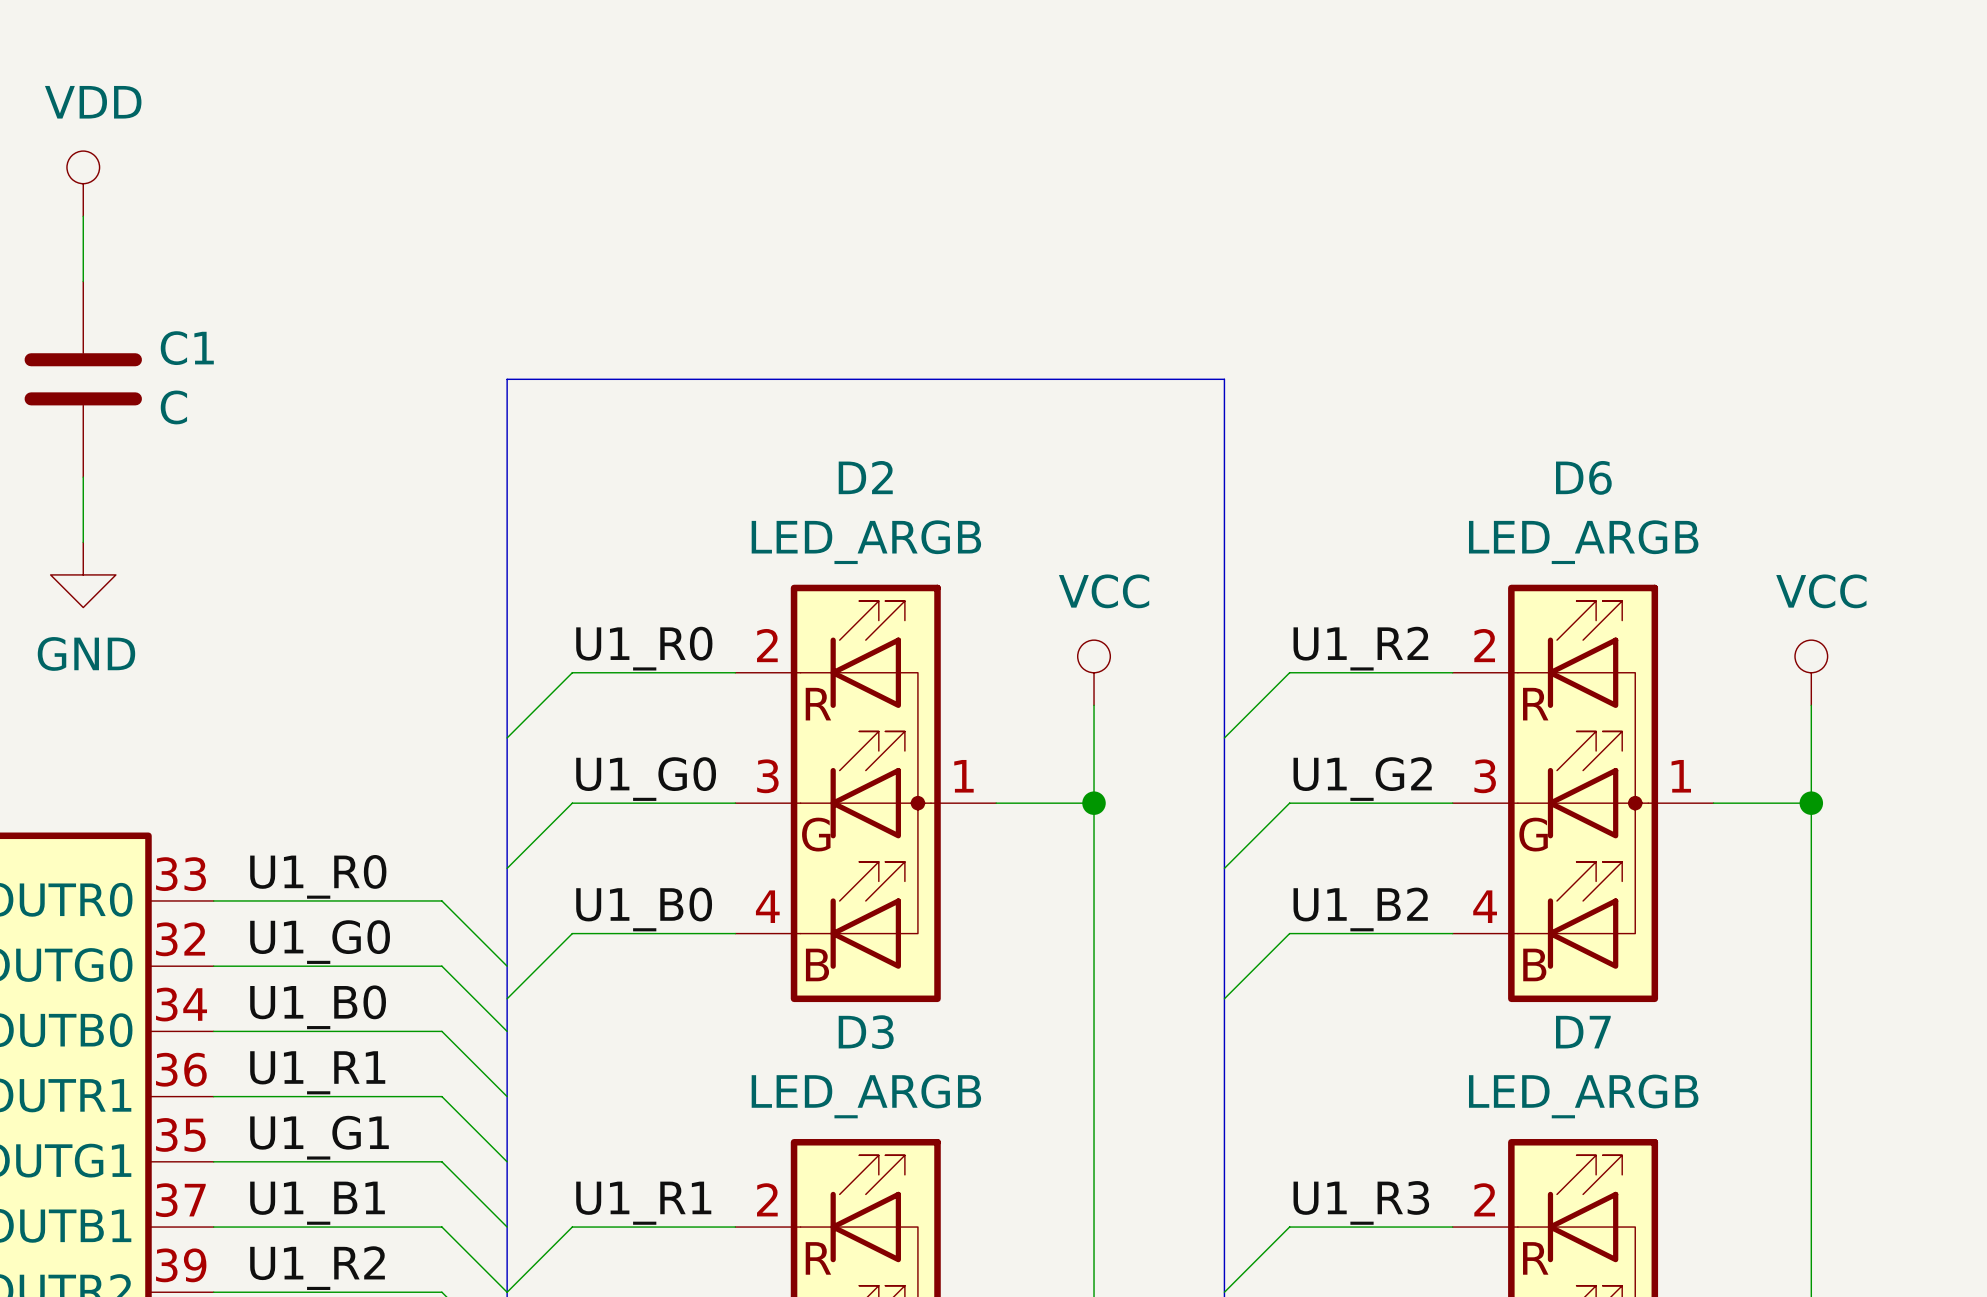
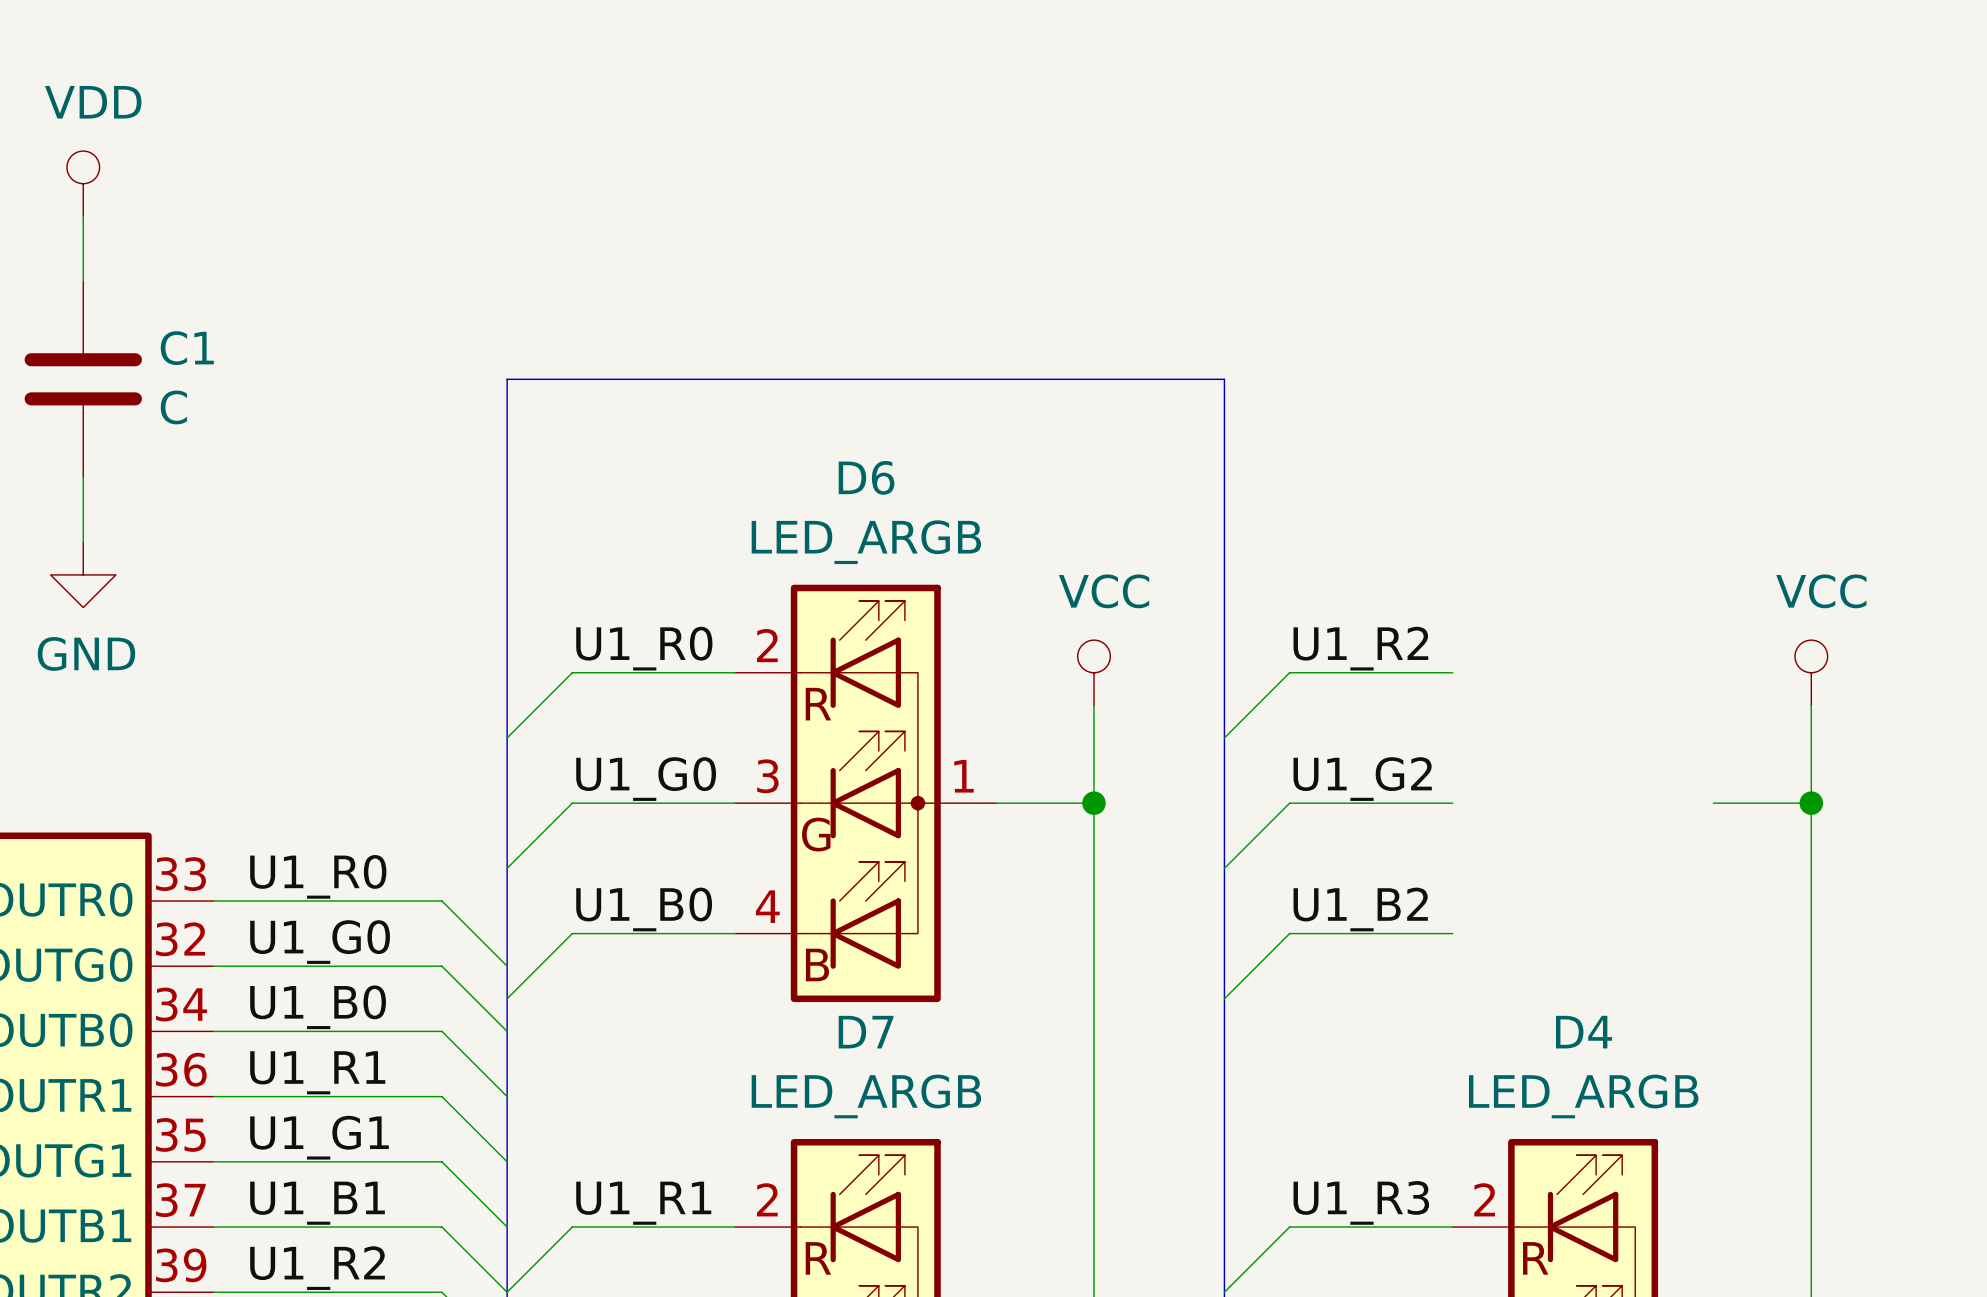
D2 name: D2 (865, 477) -> D6 (866, 477)
D6: LED_ARGB (1583, 793) -> none
D3 name: D3 (866, 1032) -> D7 (866, 1032)
D7 name: D7 (1583, 1032) -> D4 (1584, 1032)

